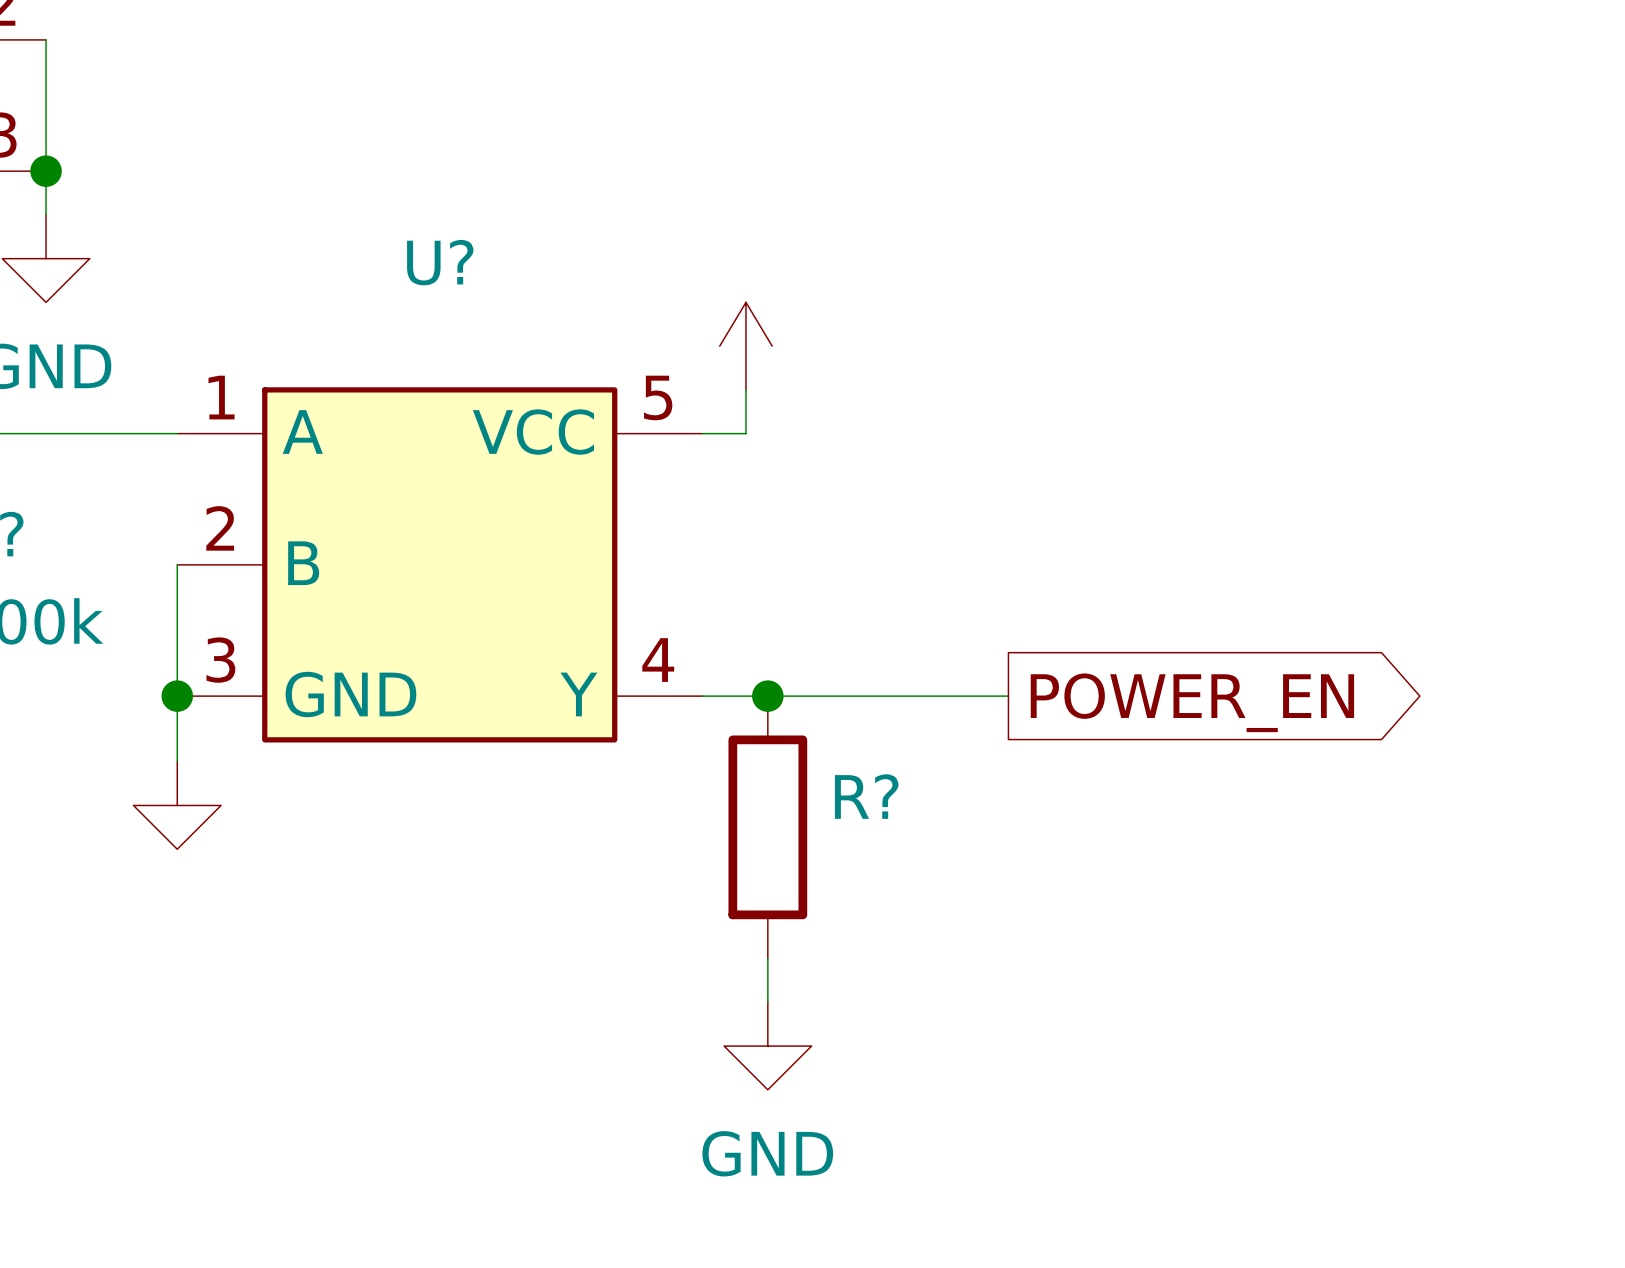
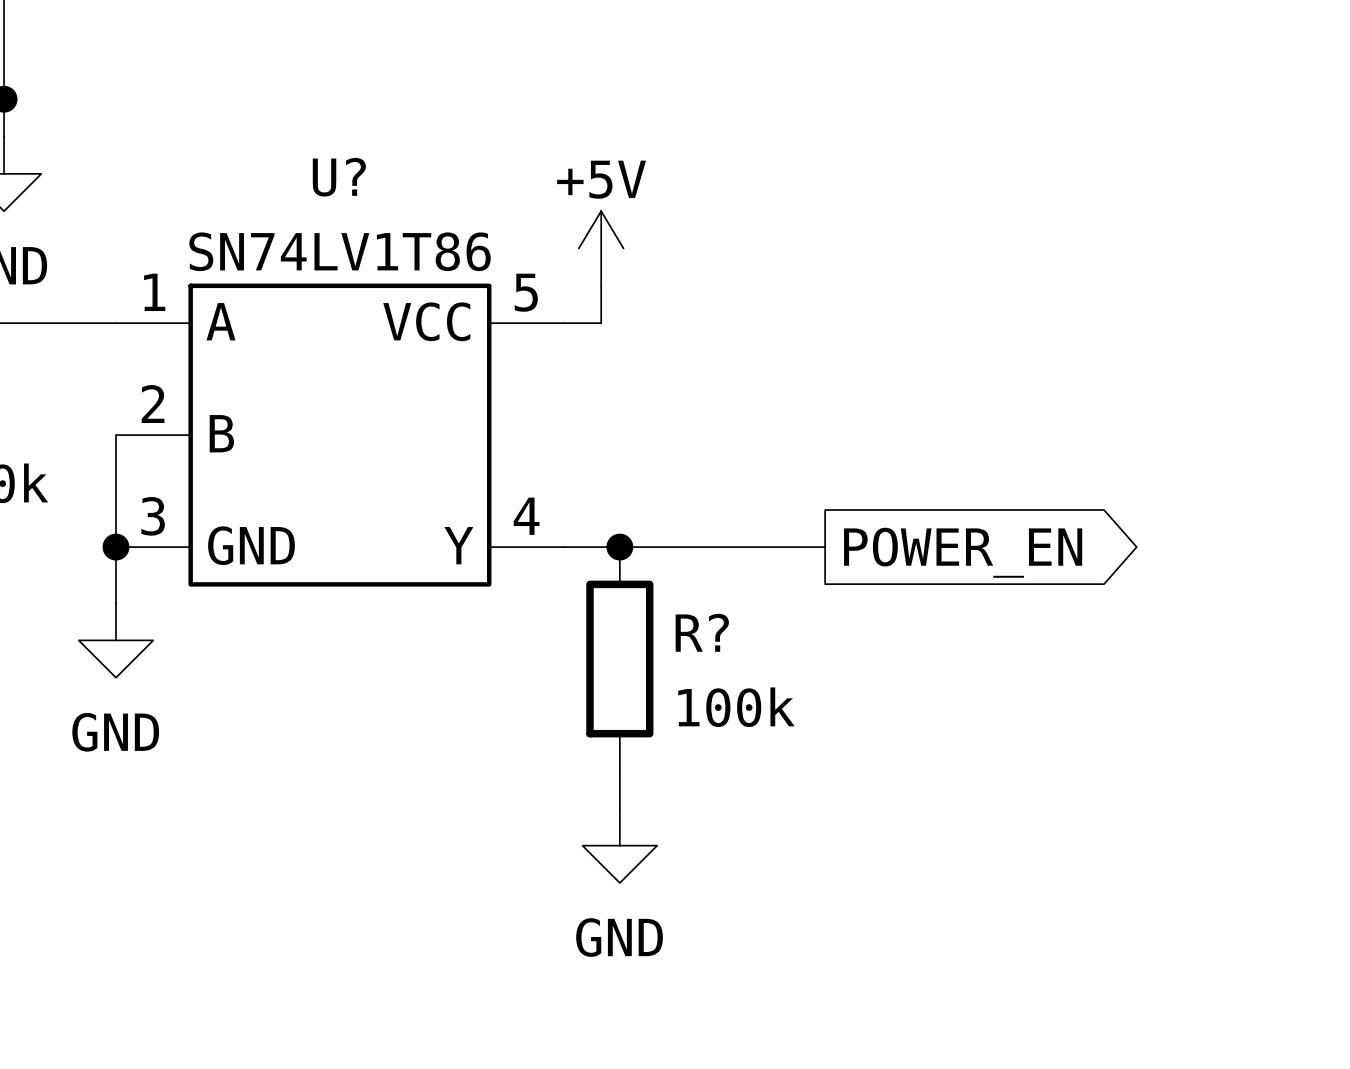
power symbol text: none -> +5V (601, 179)
U? value: none -> SN74LV1T86 (340, 251)
R? value: none -> 100k (736, 707)
power symbol text: none -> GND (115, 732)

